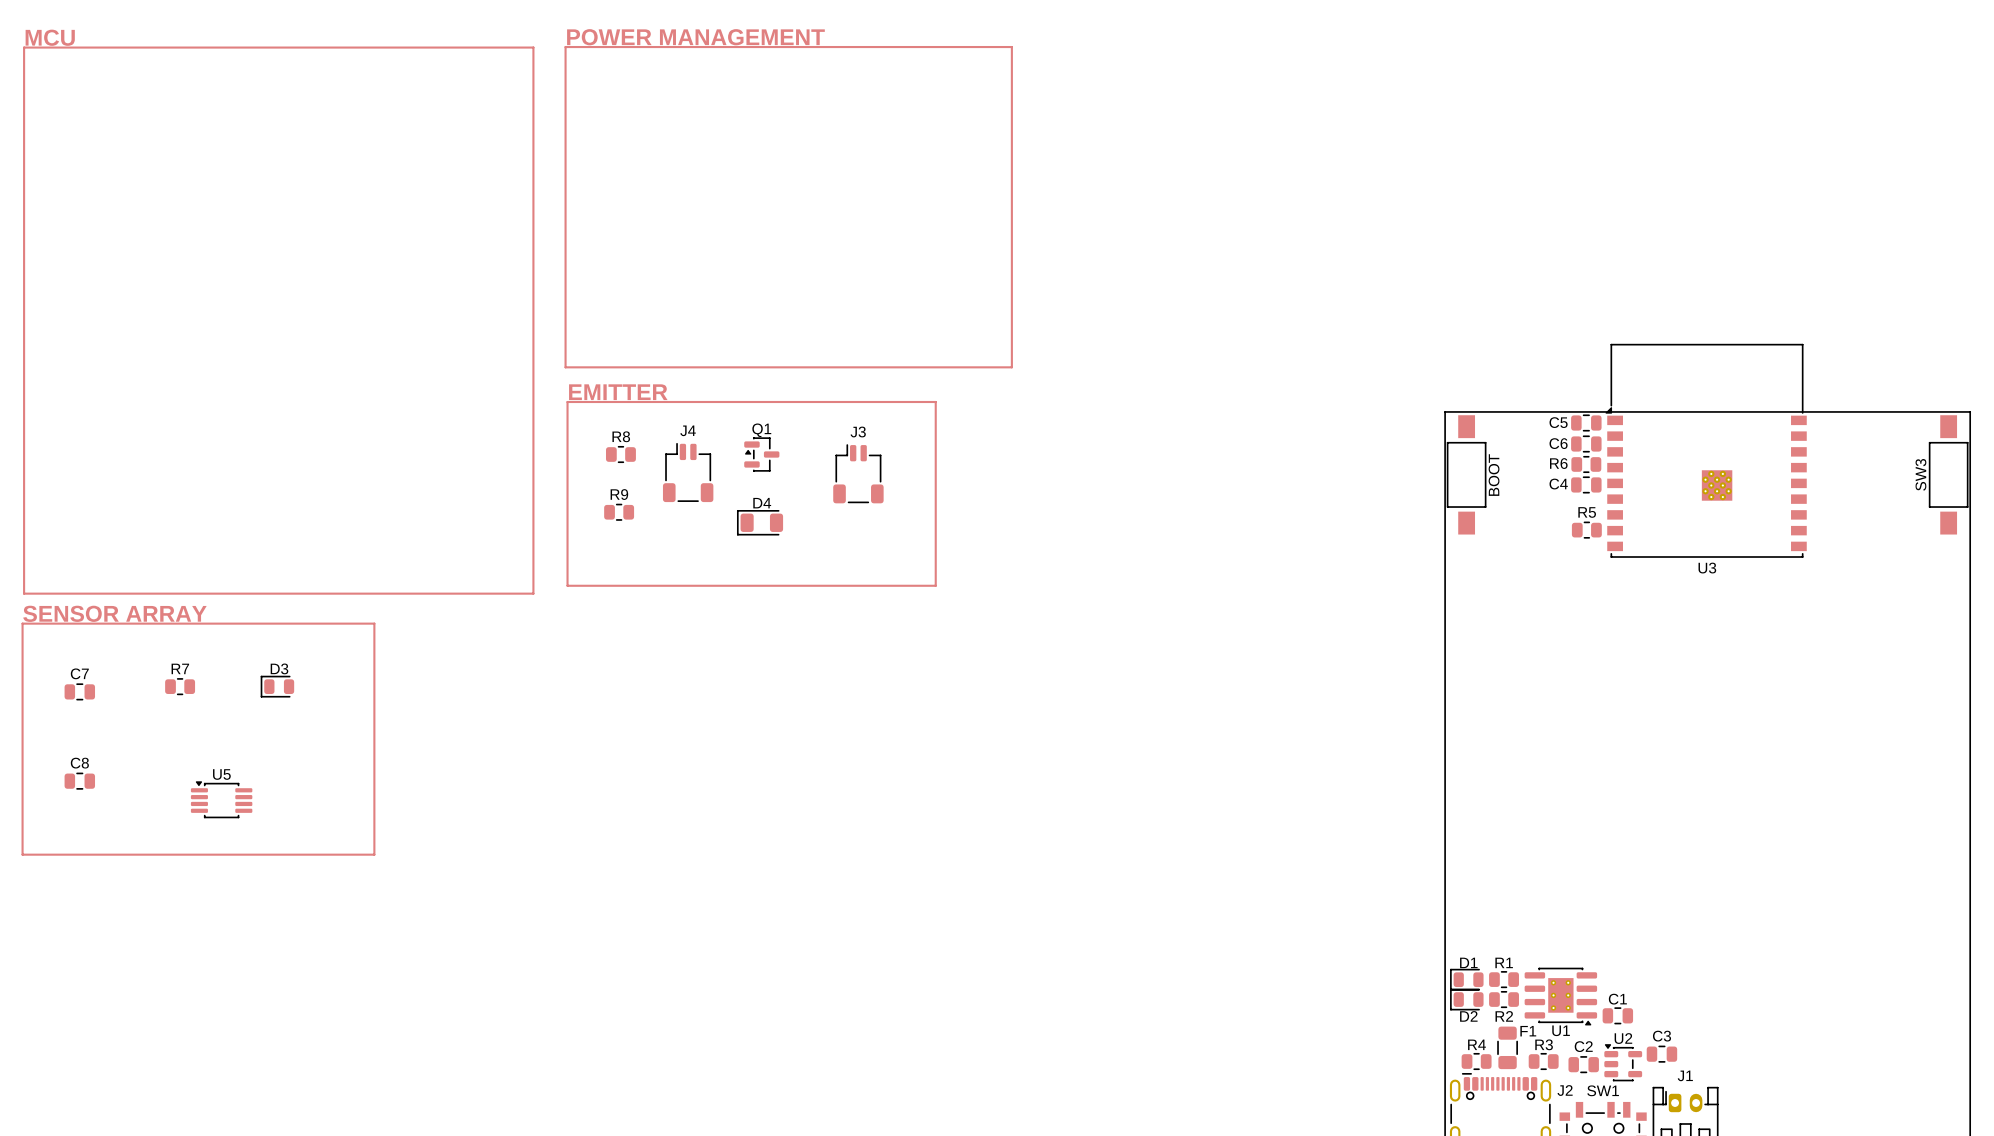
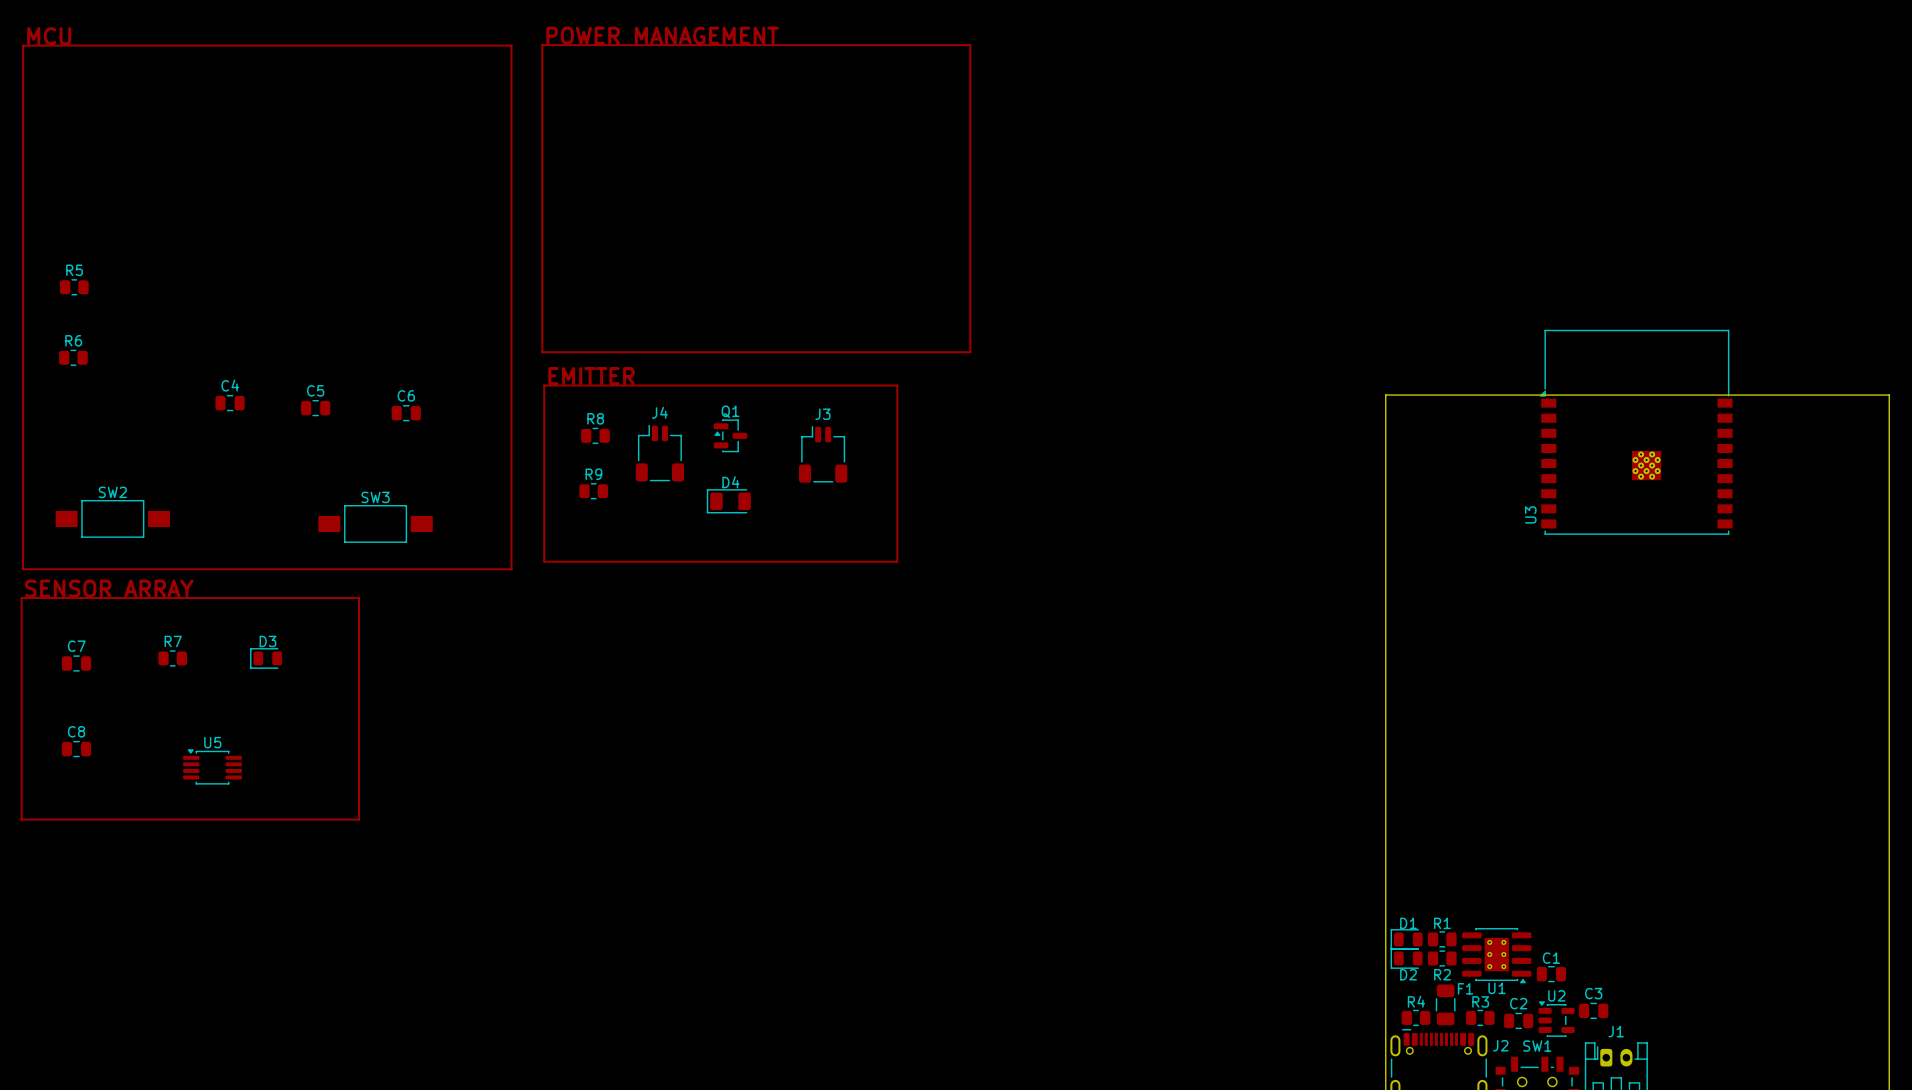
C5 name position: C5 (1558, 422) -> C5 (315, 390)
C5 position: (1586, 422) -> (315, 408)
C6 name position: C6 (1558, 443) -> C6 (406, 395)
C6 position: (1586, 444) -> (406, 413)
R6 name position: R6 (1558, 463) -> R6 (73, 340)
R6 position: (1586, 464) -> (73, 357)
BOOT: (1466, 474) -> none
SW3 rotation: 0° (1948, 474) -> 90° clockwise (375, 523)
SW3 position: (1948, 474) -> (375, 523)
C4 name position: C4 (1558, 484) -> C4 (230, 385)
C4 position: (1586, 484) -> (230, 403)
R5 position: (1586, 530) -> (74, 287)
SW2: none -> (112, 518)
U3 name rotation: 0° (1707, 568) -> 90° counterclockwise (1530, 514)
U3 name position: U3 (1707, 568) -> U3 (1530, 514)

